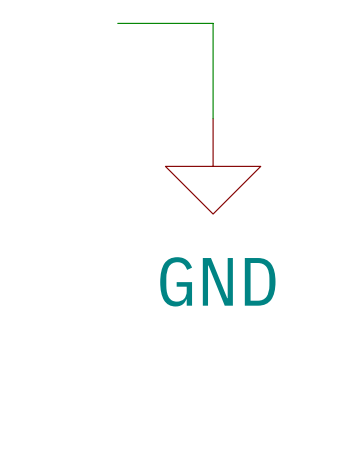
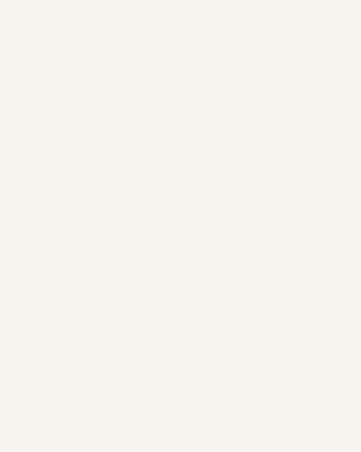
wire: (117, 23) (213, 23) (213, 118) -> none
power symbol: GND (213, 166) -> none

